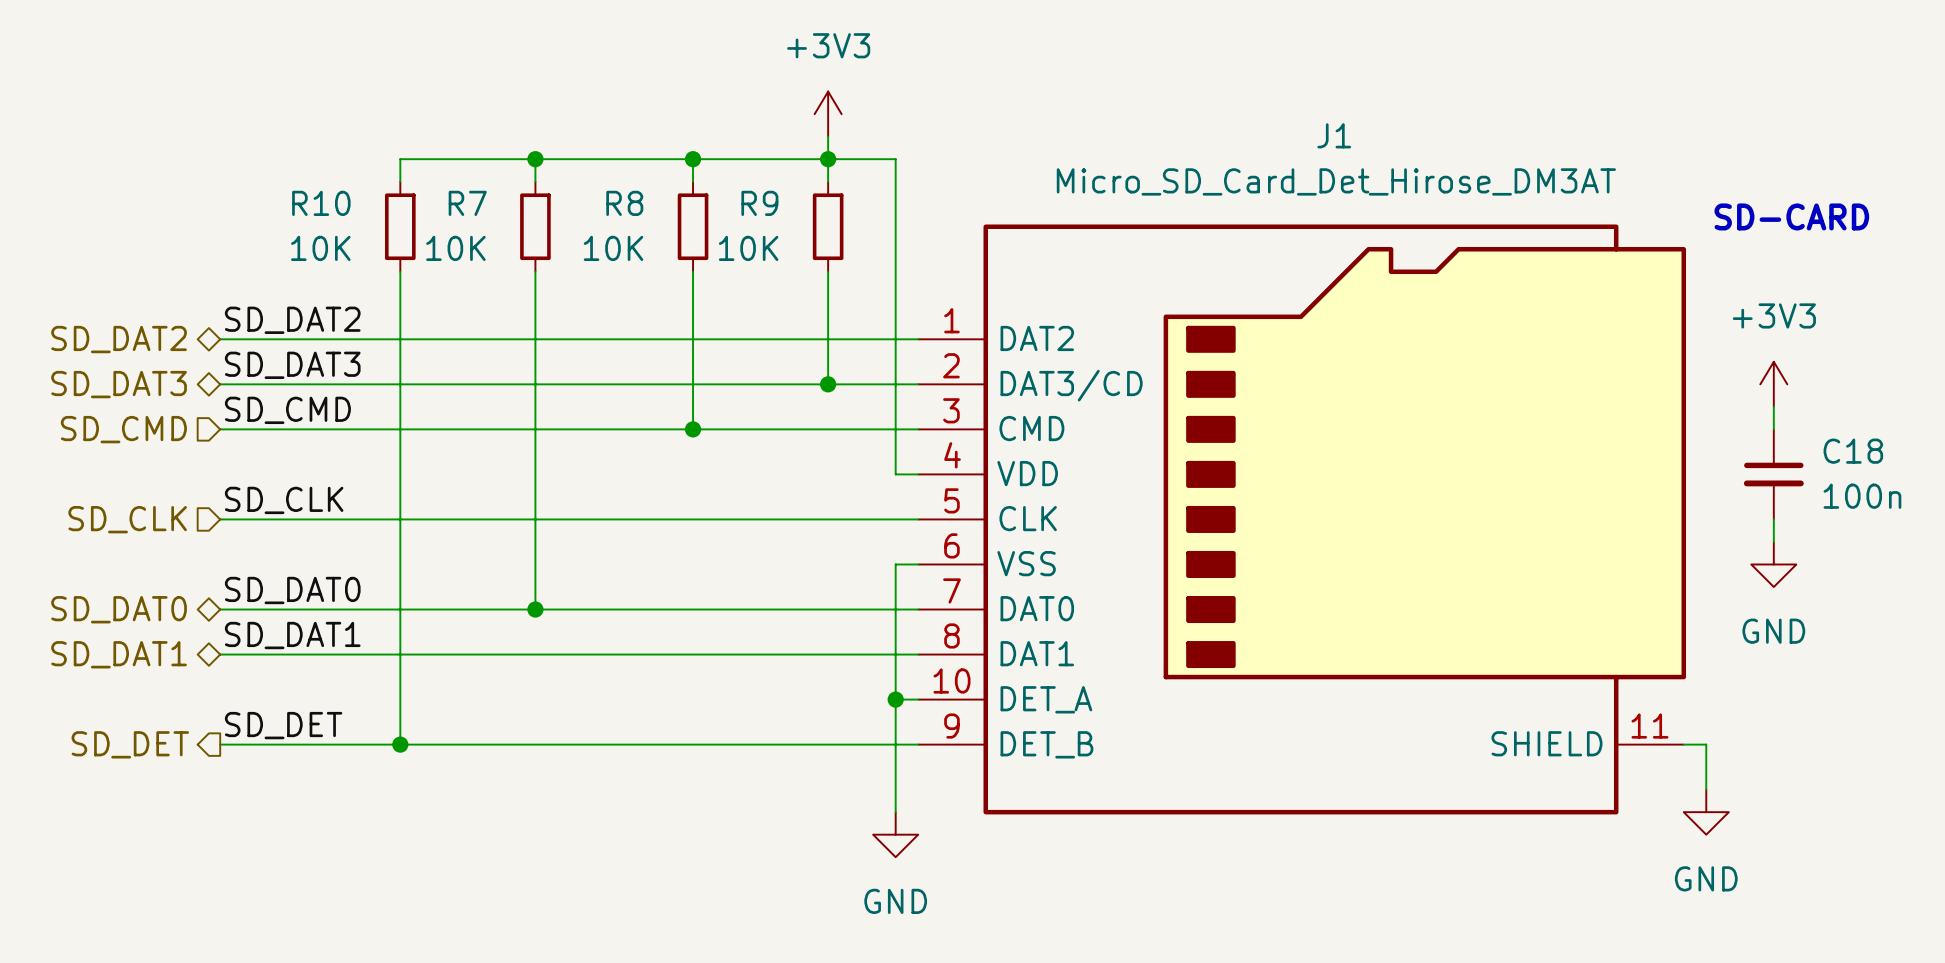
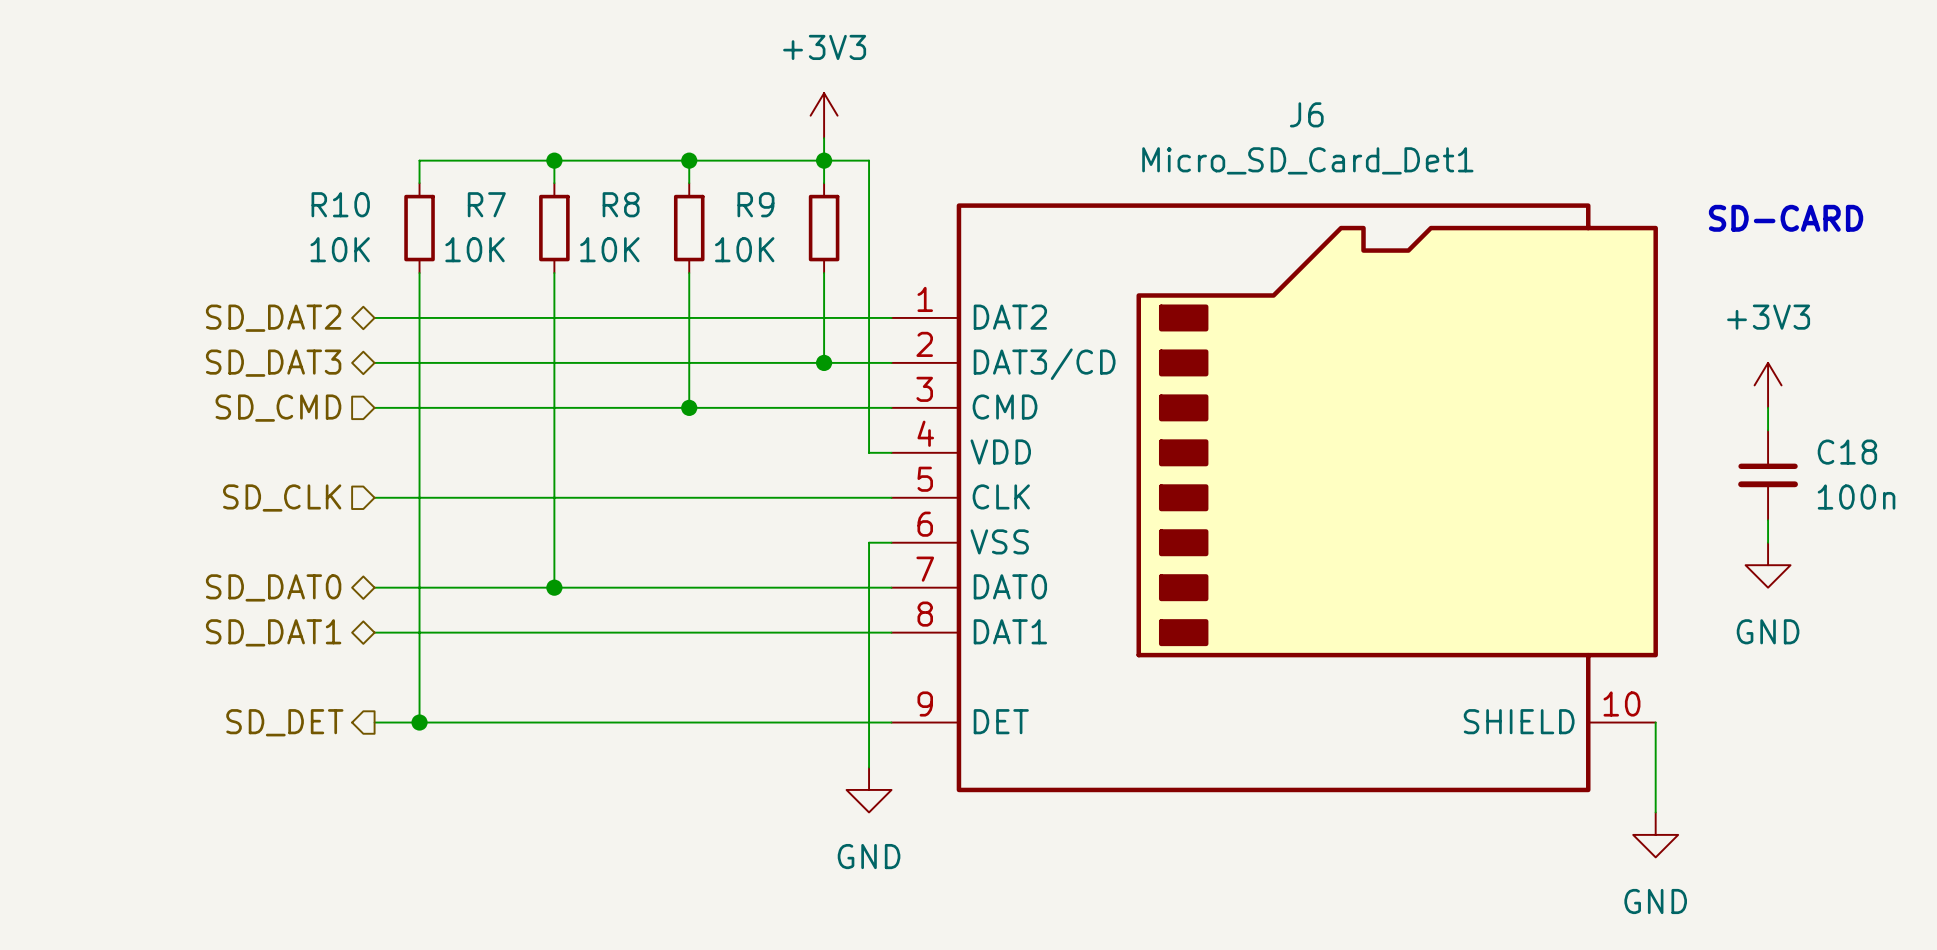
wire: (422, 159) (400, 159) (400, 181) -> (419, 160) (419, 183)
wire: (535, 159) (535, 181) -> (554, 160) (554, 183)
junction position: (535, 159) -> (554, 160)
wire: (873, 159) (895, 159) (895, 474) (918, 474) -> (869, 160) (869, 452) (891, 452)
R10 position: (400, 226) -> (419, 228)
R7 position: (535, 226) -> (554, 228)
wire: (400, 271) (400, 744) -> none
wire: none -> (419, 273) (419, 722)
wire: (535, 271) (535, 609) -> none
wire: none -> (554, 273) (554, 587)
wire: none -> (374, 317) (891, 317)
label: SD_DAT2 (292, 320) -> none
hierarchical label position: SD_DAT2 (119, 339) -> SD_DAT2 (273, 318)
wire: (220, 339) (918, 339) -> none
wire: none -> (374, 362) (891, 362)
wire: (828, 361) (828, 384) -> none
label: SD_DAT3 (292, 365) -> none
hierarchical label position: SD_DAT3 (119, 384) -> SD_DAT3 (273, 363)
wire: (220, 384) (918, 384) -> none
junction position: (828, 384) -> (824, 362)
wire: none -> (374, 407) (891, 407)
wire: (693, 406) (693, 429) -> none
label: SD_CMD (287, 410) -> none
hierarchical label position: SD_CMD (123, 429) -> SD_CMD (278, 408)
wire: (220, 429) (918, 429) -> none
junction position: (693, 429) -> (689, 407)
wire: none -> (374, 497) (891, 497)
J6: none -> Micro_SD_Card_Det1 (1274, 497)
label: SD_CLK (284, 500) -> none
hierarchical label position: SD_CLK (127, 519) -> SD_CLK (282, 498)
wire: (220, 519) (918, 519) -> none
J1: Micro_SD_Card_Det_Hirose_DM3AT (1302, 519) -> none
wire: none -> (891, 542) (869, 542) (869, 767)
wire: (918, 564) (895, 564) (895, 812) -> none
wire: none -> (374, 587) (891, 587)
label: SD_DAT0 (292, 590) -> none
hierarchical label position: SD_DAT0 (119, 609) -> SD_DAT0 (273, 587)
wire: (220, 609) (918, 609) -> none
junction position: (535, 609) -> (554, 587)
wire: none -> (374, 632) (891, 632)
label: SD_DAT1 (292, 635) -> none
hierarchical label position: SD_DAT1 (119, 654) -> SD_DAT1 (273, 632)
wire: (220, 654) (918, 654) -> none
wire: (895, 699) (918, 699) -> none
junction: (895, 699) -> none
wire: none -> (374, 722) (891, 722)
wire: none -> (1655, 722) (1655, 812)
label: SD_DET (283, 725) -> none
hierarchical label position: SD_DET (130, 744) -> SD_DET (284, 722)
wire: (220, 744) (918, 744) -> none
junction position: (400, 744) -> (419, 722)
wire: (1683, 744) (1706, 744) (1706, 789) -> none
power symbol position: GND (1706, 812) -> GND (1655, 834)
power symbol position: GND (895, 834) -> GND (869, 789)

